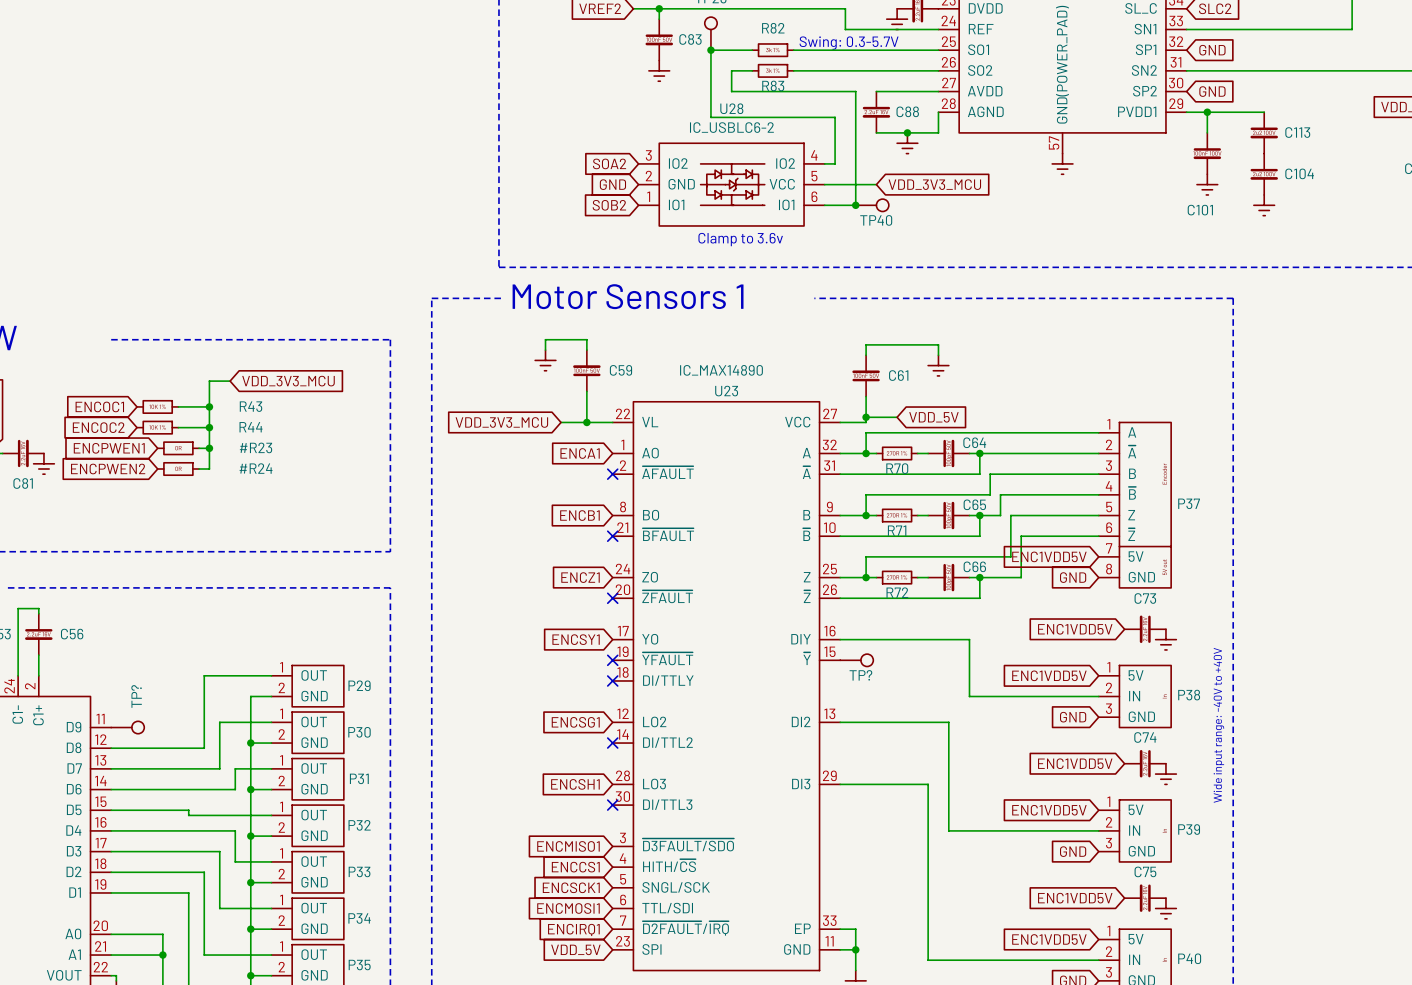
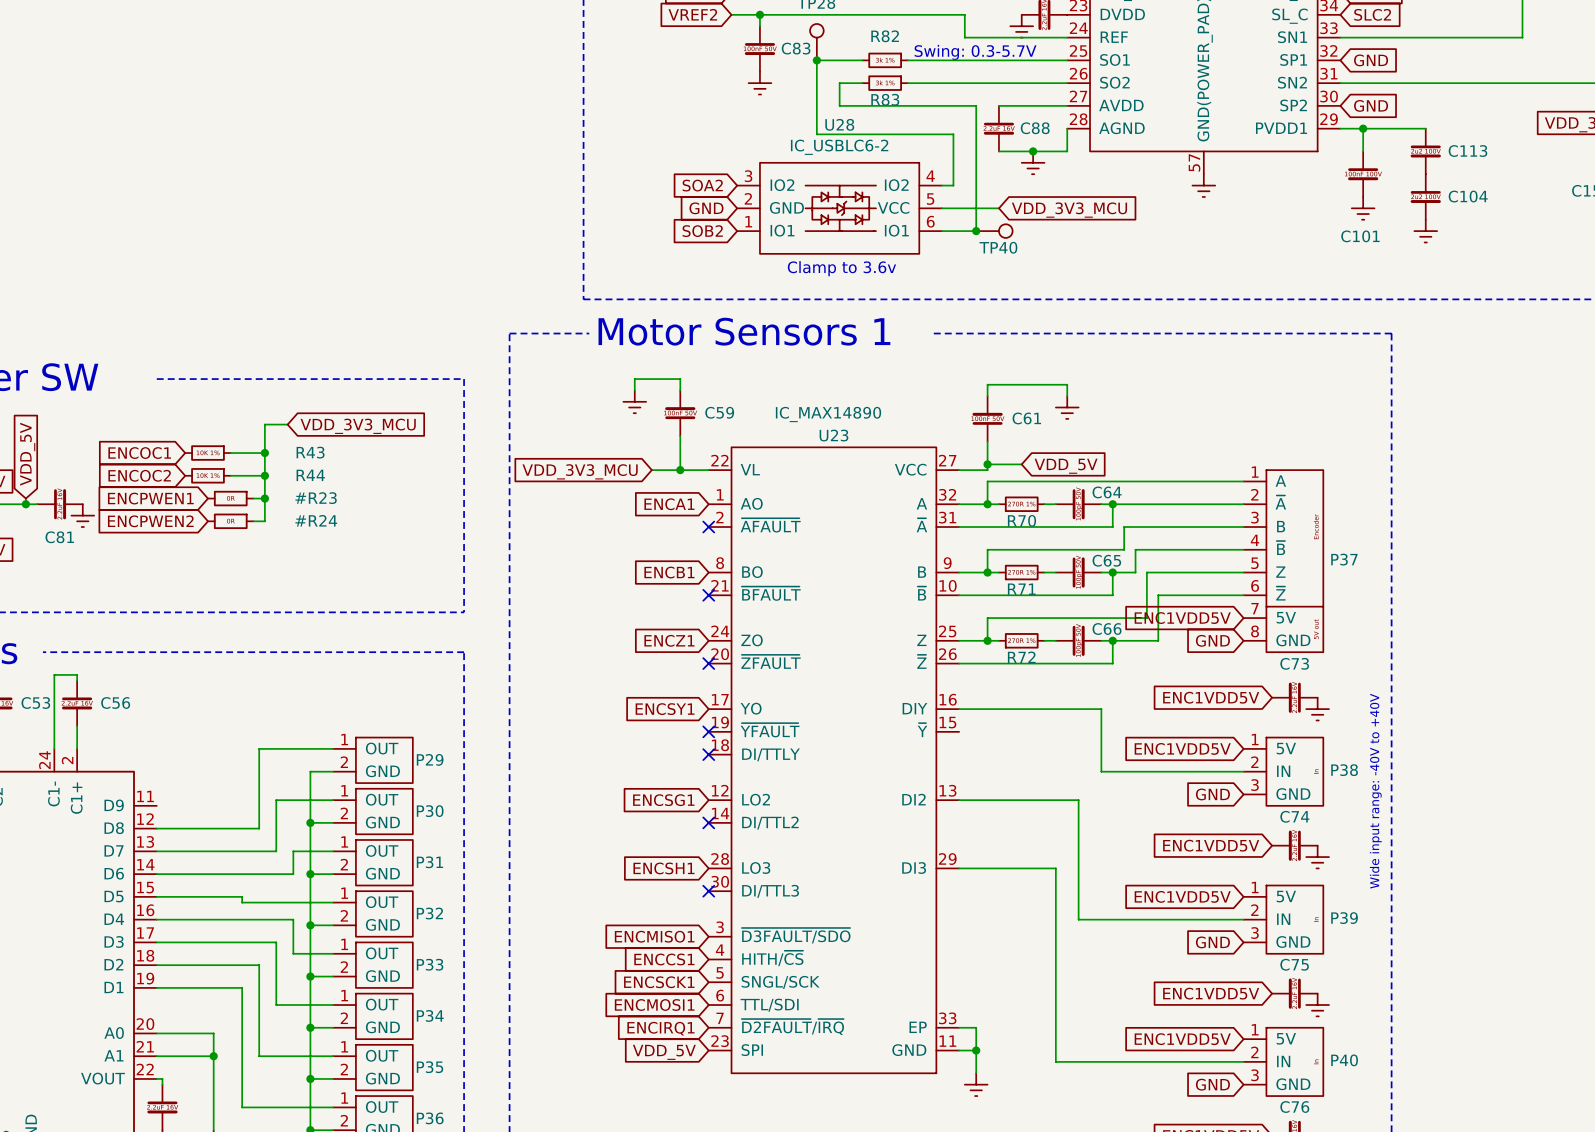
TP?: (856, 660) -> none
TP?: (127, 727) -> none

